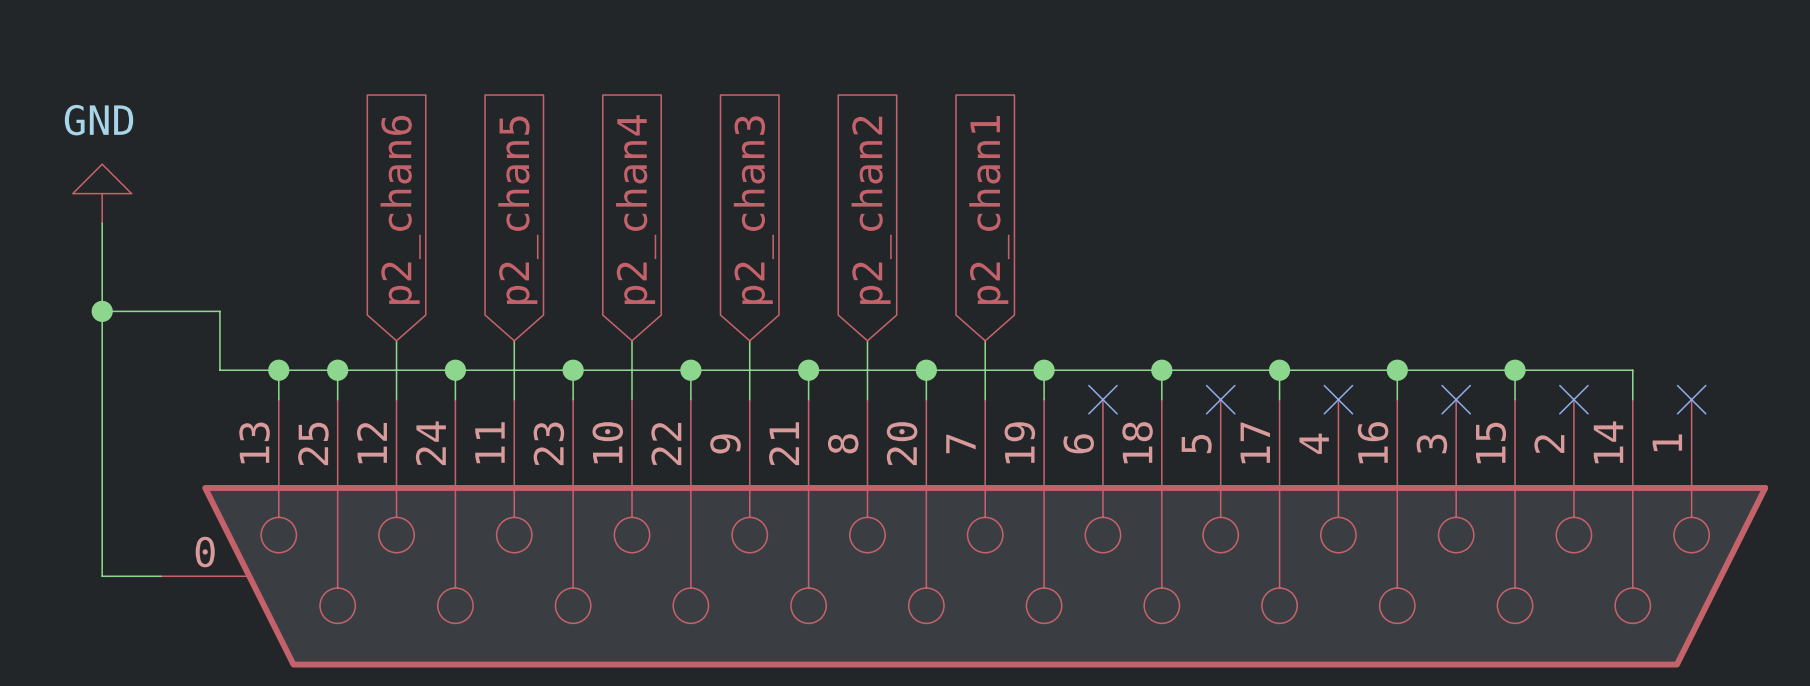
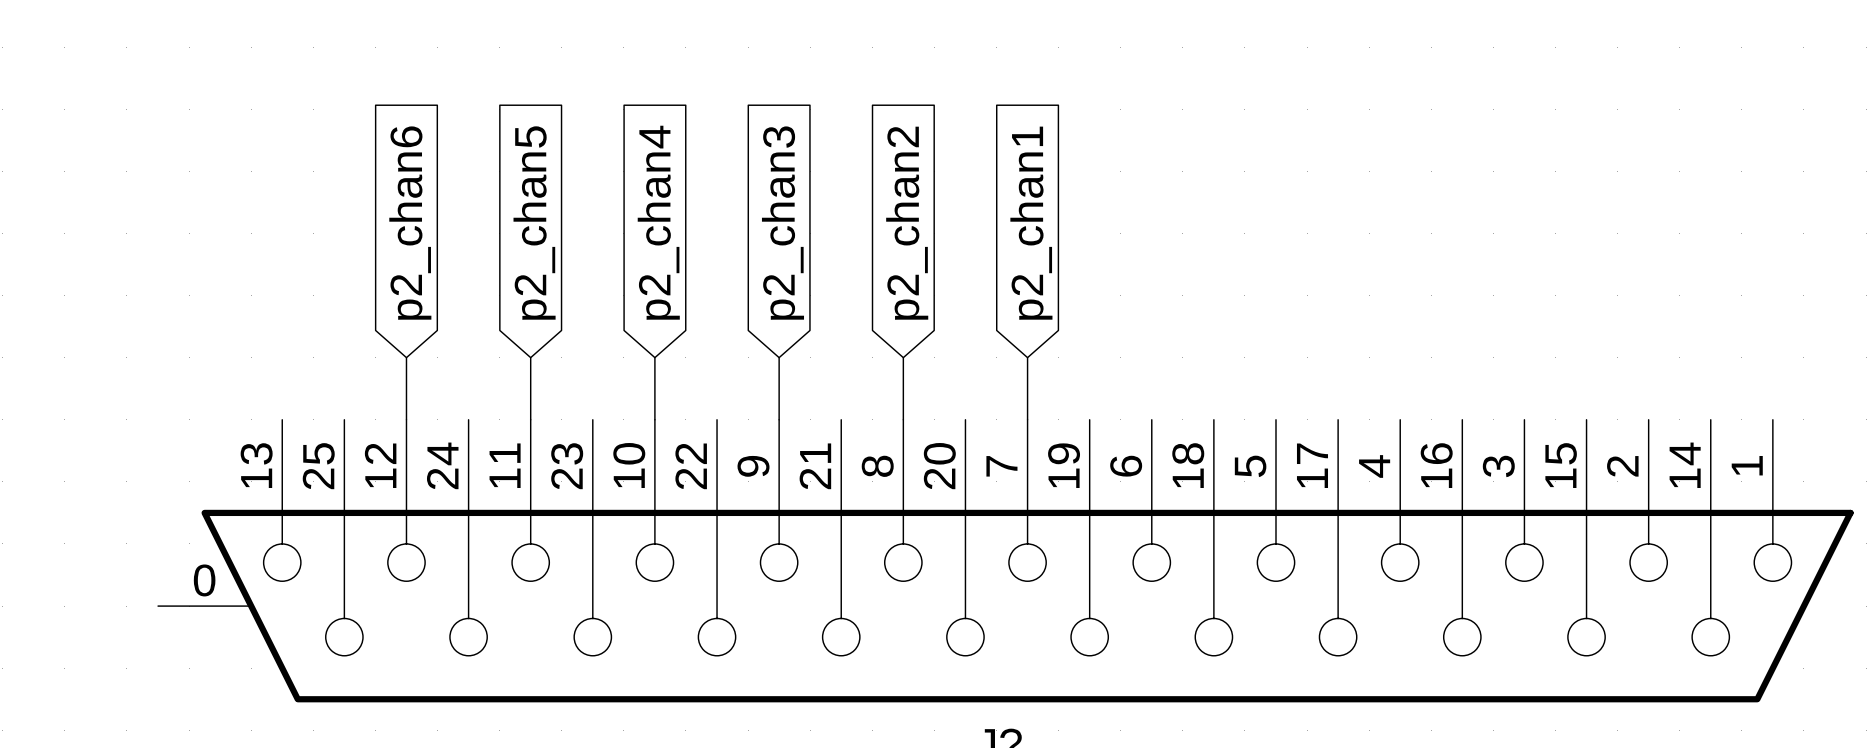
power symbol: GND (102, 193) -> none
wire: (102, 223) (102, 576) (161, 576) -> none
wire: (102, 311) (219, 311) (219, 370) (1632, 370) (1632, 399) -> none
junction: (102, 311) -> none
wire: (278, 370) (278, 399) -> none
junction: (278, 370) -> none
wire: (337, 370) (337, 399) -> none
junction: (337, 370) -> none
wire: (455, 370) (455, 399) -> none
junction: (455, 370) -> none
wire: (573, 370) (573, 399) -> none
junction: (573, 370) -> none
wire: (690, 370) (690, 399) -> none
junction: (690, 370) -> none
wire: (808, 370) (808, 399) -> none
junction: (808, 370) -> none
wire: (926, 370) (926, 399) -> none
junction: (926, 370) -> none
wire: (1044, 370) (1044, 399) -> none
junction: (1044, 370) -> none
wire: (1161, 370) (1161, 399) -> none
junction: (1161, 370) -> none
wire: (1279, 370) (1279, 399) -> none
junction: (1279, 370) -> none
wire: (1397, 370) (1397, 399) -> none
junction: (1397, 370) -> none
wire: (1515, 370) (1515, 399) -> none
junction: (1515, 370) -> none
no-connect mark: (1102, 399) -> none
no-connect mark: (1220, 399) -> none
no-connect mark: (1338, 399) -> none
no-connect mark: (1456, 399) -> none
no-connect mark: (1573, 399) -> none
no-connect mark: (1691, 399) -> none

